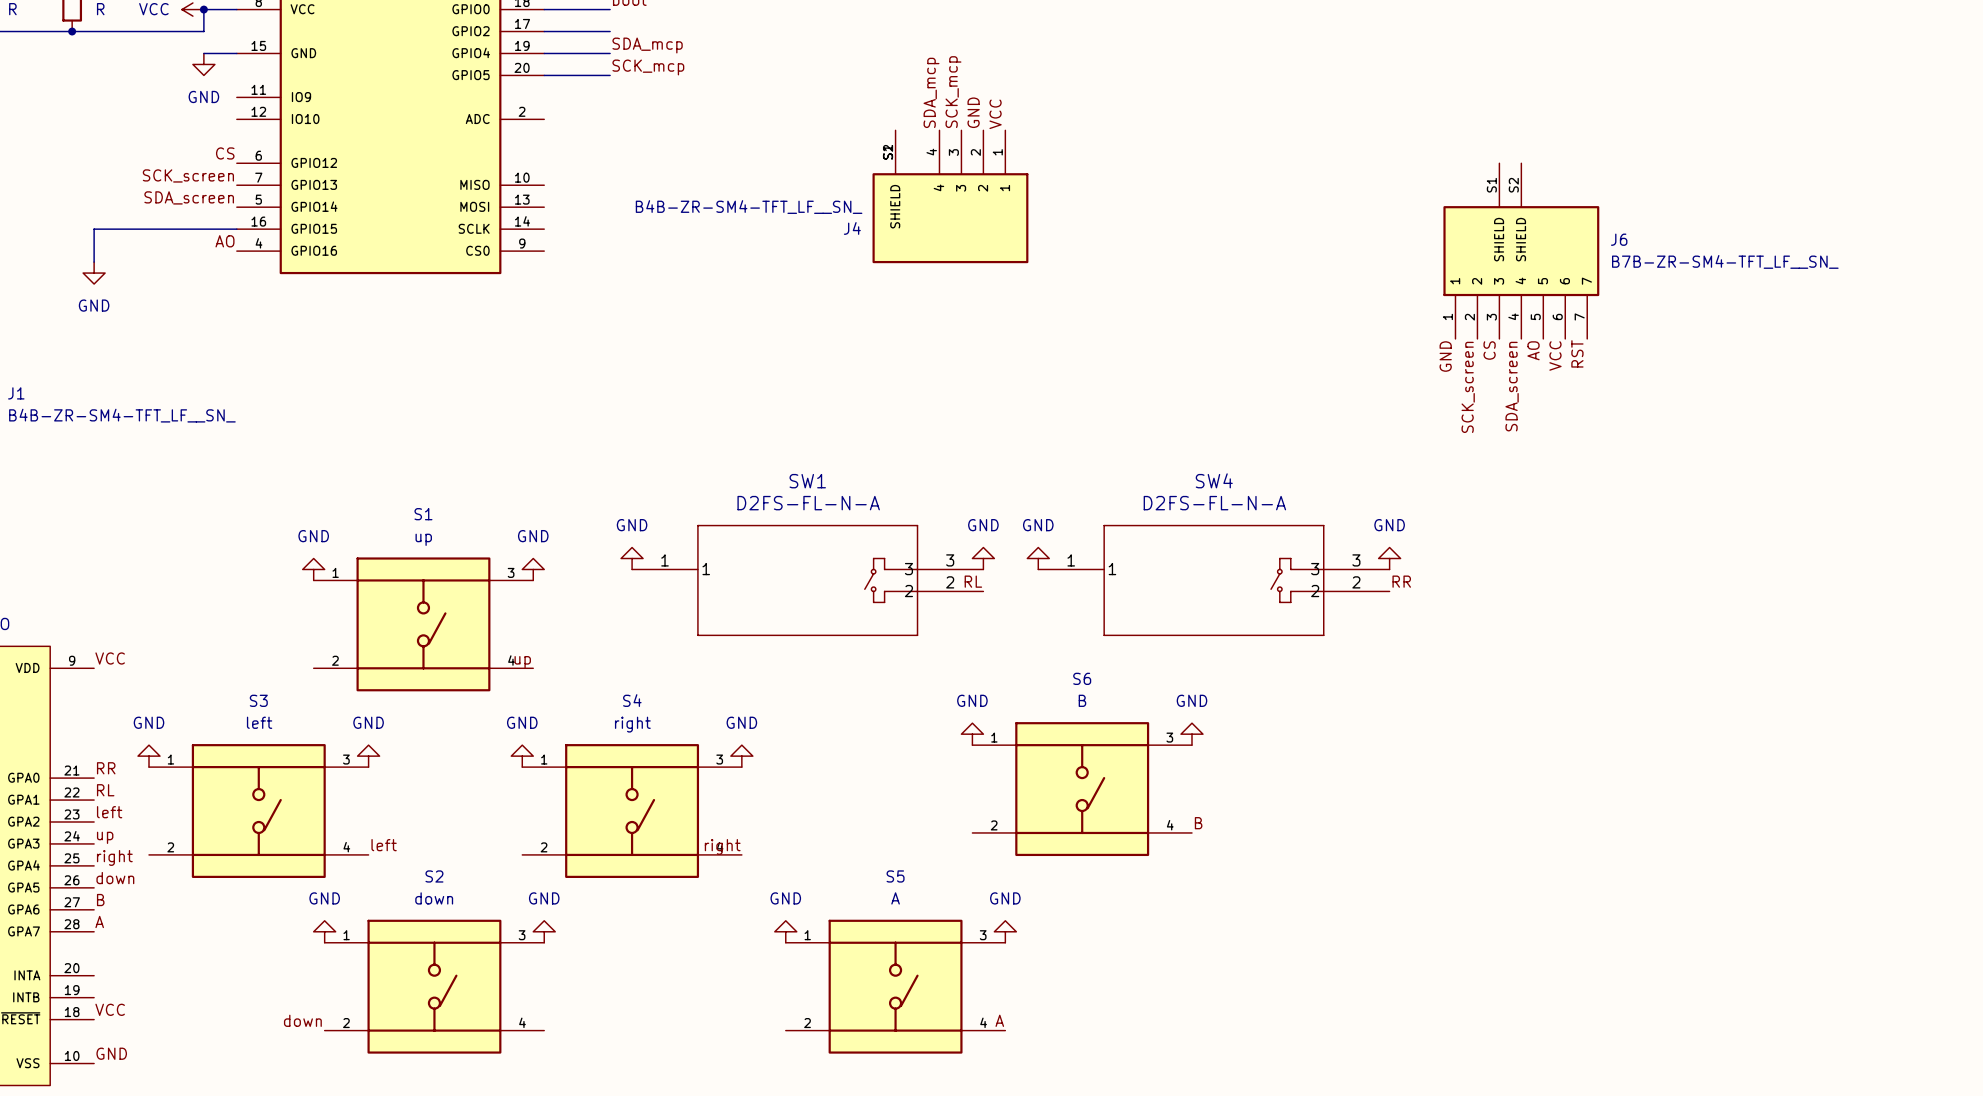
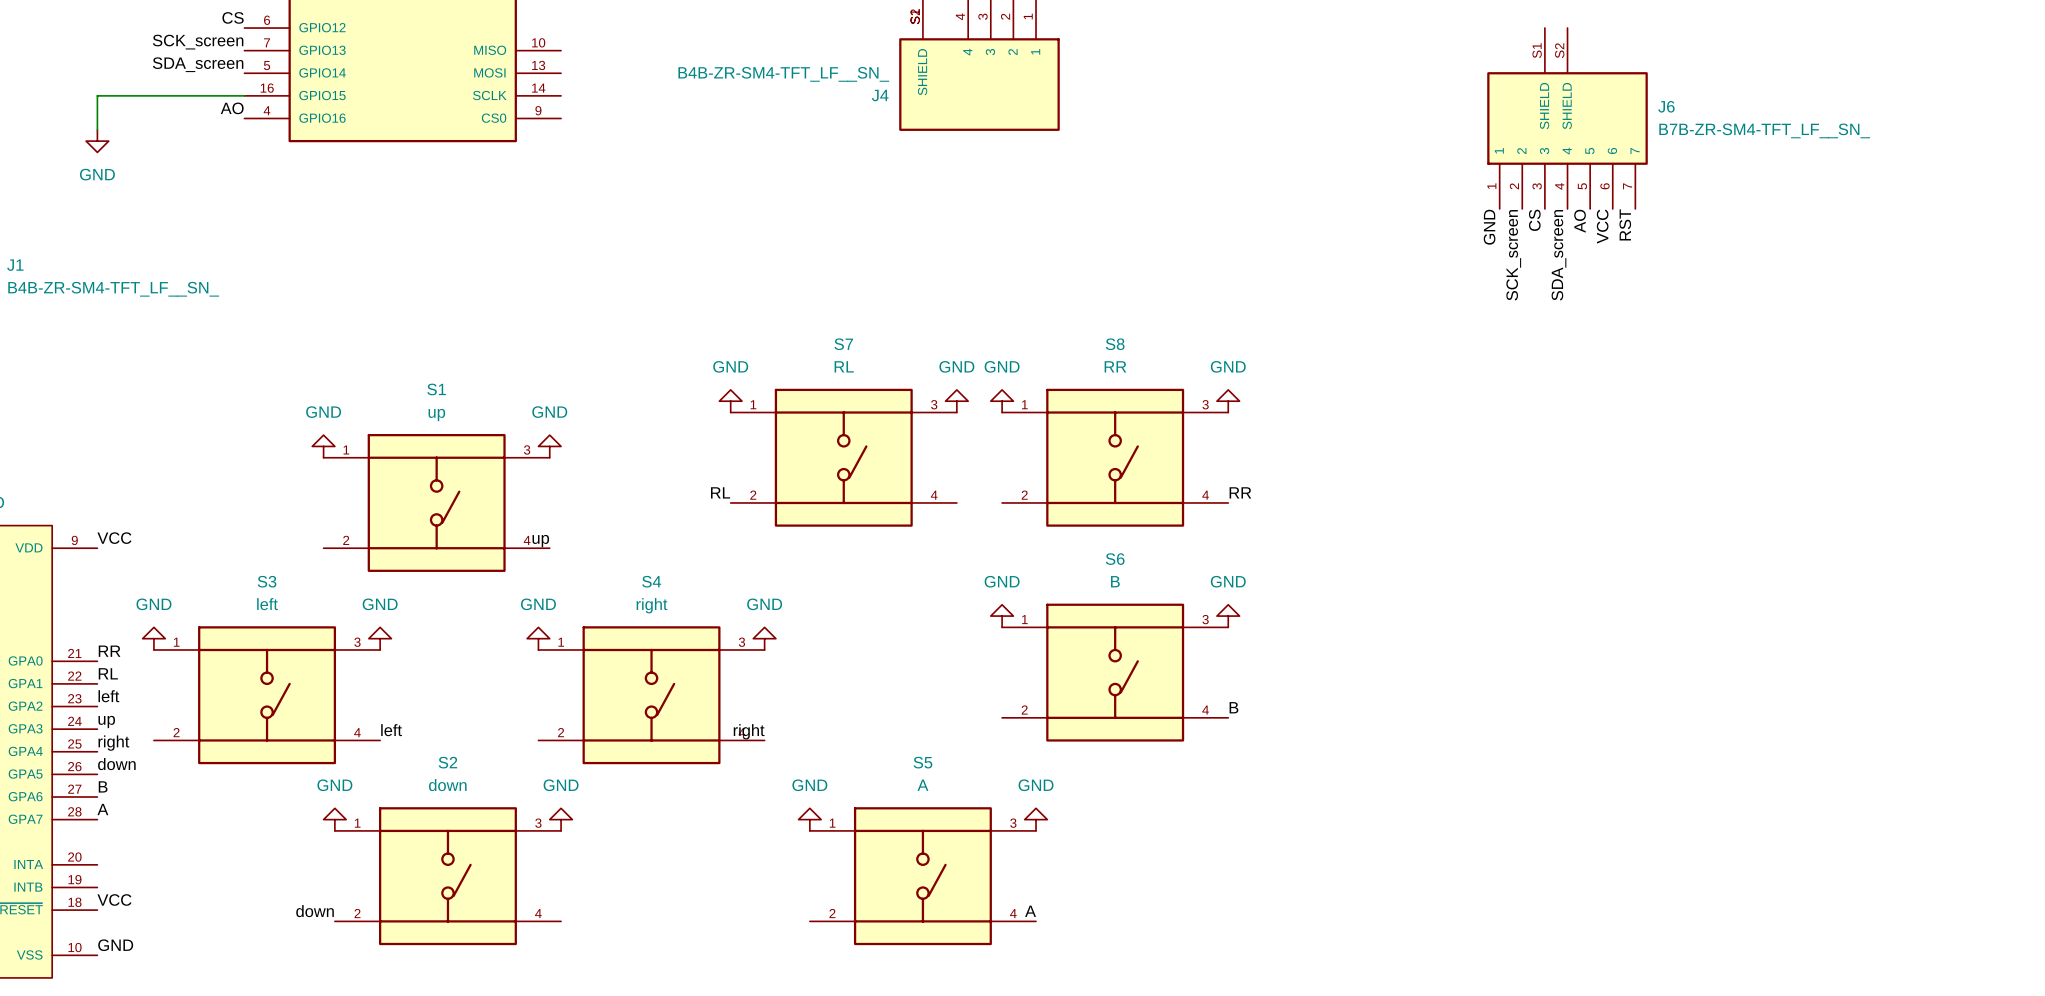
power symbol: none -> GND (956, 401)
power symbol: none -> GND (1002, 401)
power symbol: none -> GND (1228, 401)
power symbol position: GND (632, 558) -> GND (730, 401)
power symbol: GND (983, 558) -> none
power symbol: GND (1038, 558) -> none
power symbol: GND (1389, 558) -> none
SW1: D2FS-FL-N-A (807, 580) -> none
S7: none -> RL (843, 457)
S8: none -> RR (1115, 457)
SW4: D2FS-FL-N-A (1213, 580) -> none
label: RL (973, 581) -> none
label position: RR (1401, 581) -> RR (1240, 492)
label: none -> RL (720, 492)

